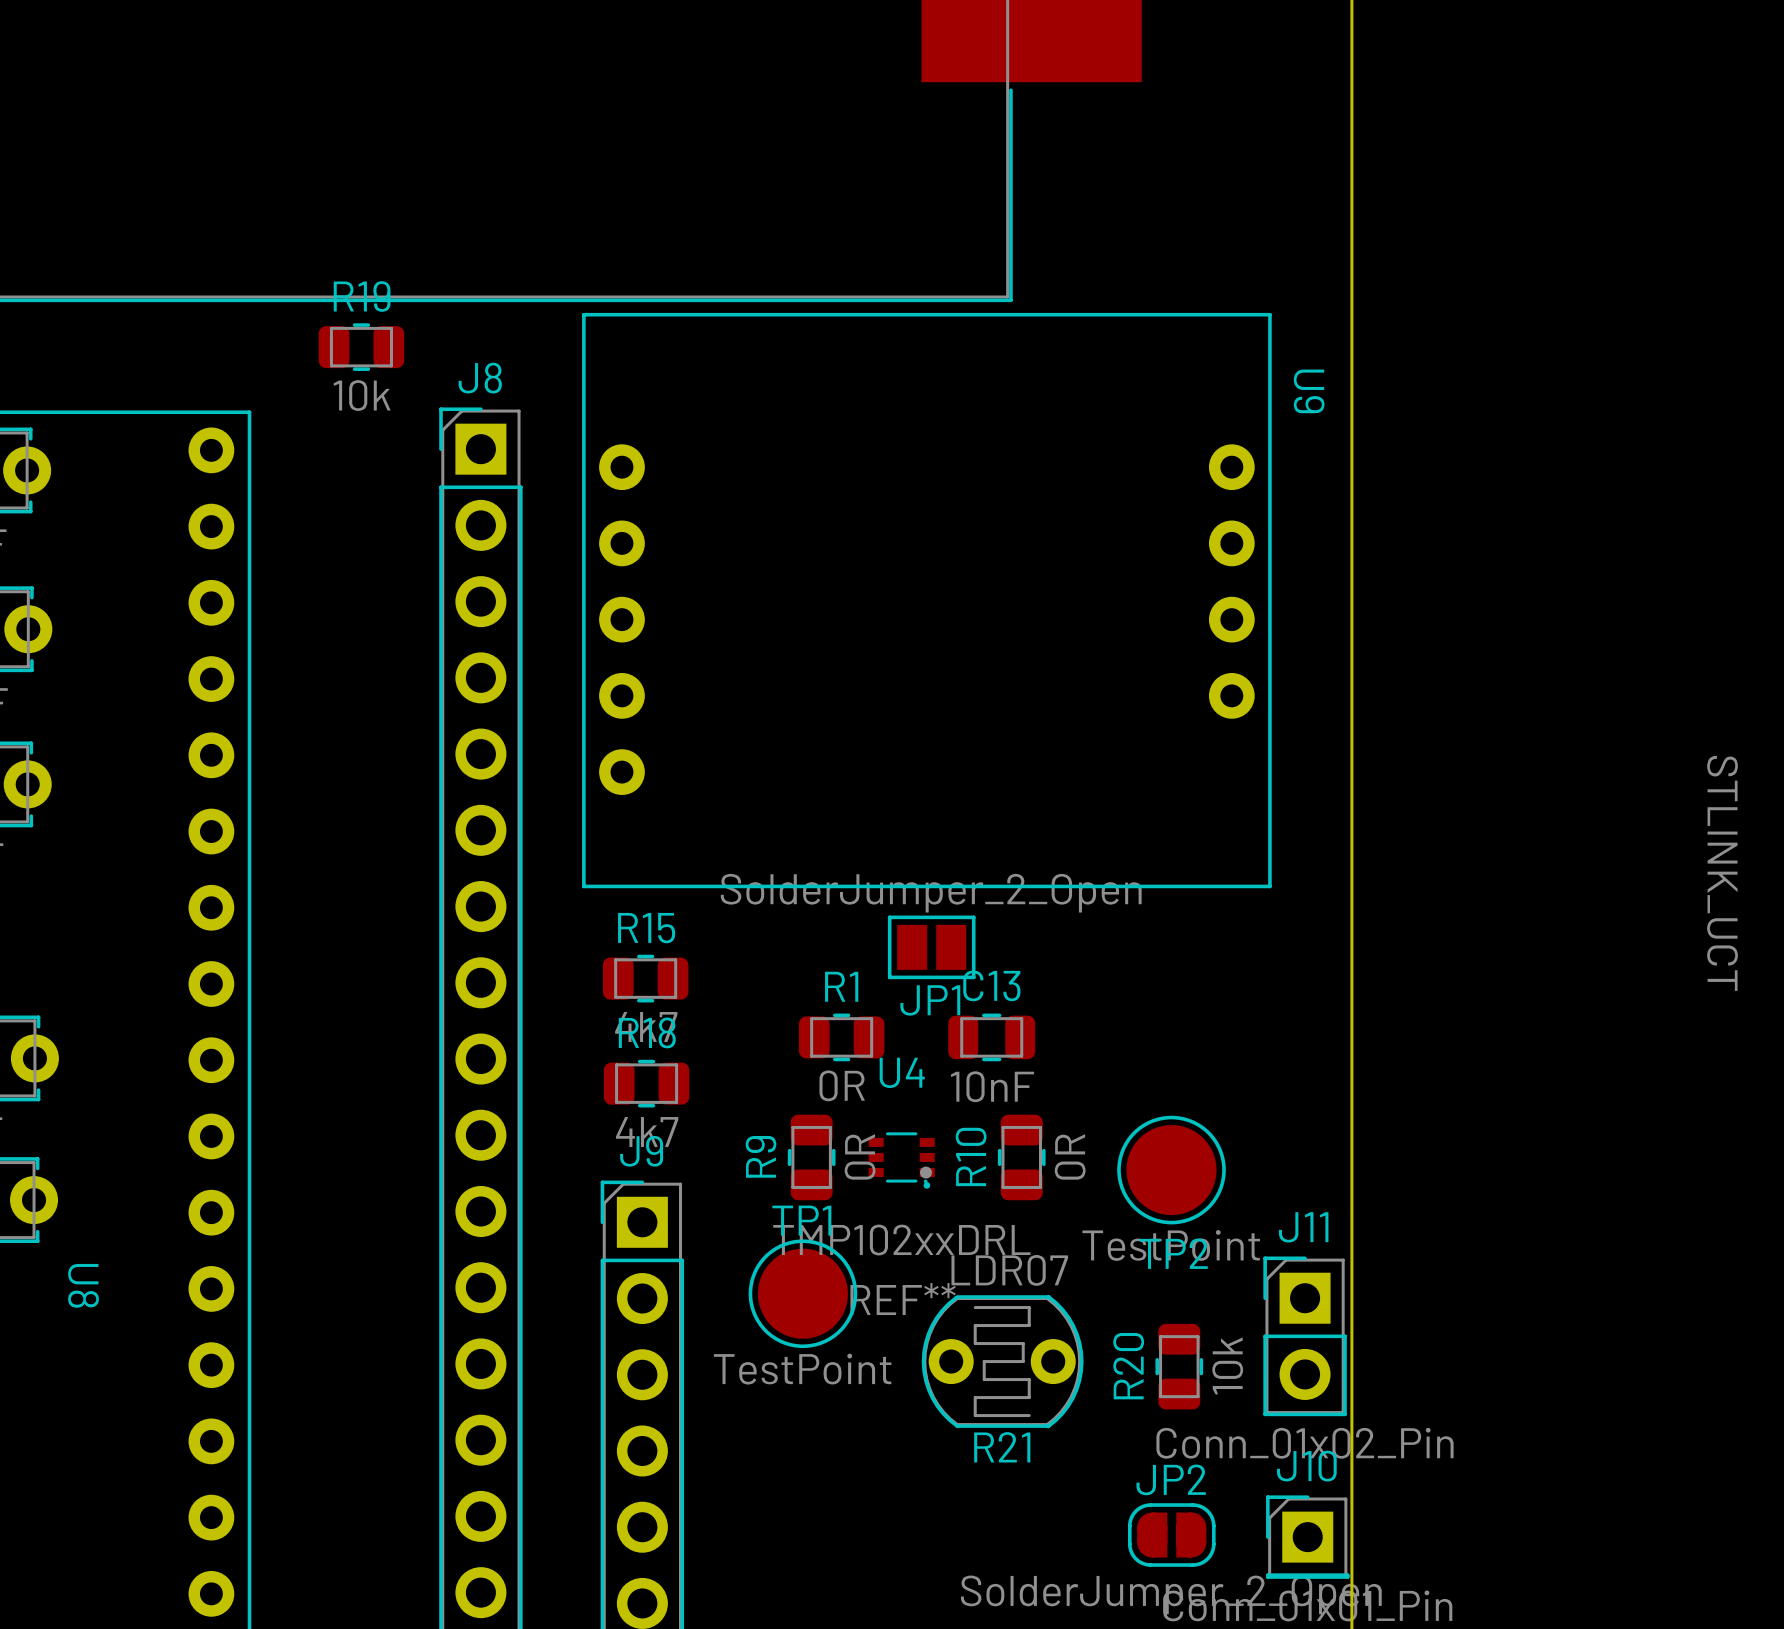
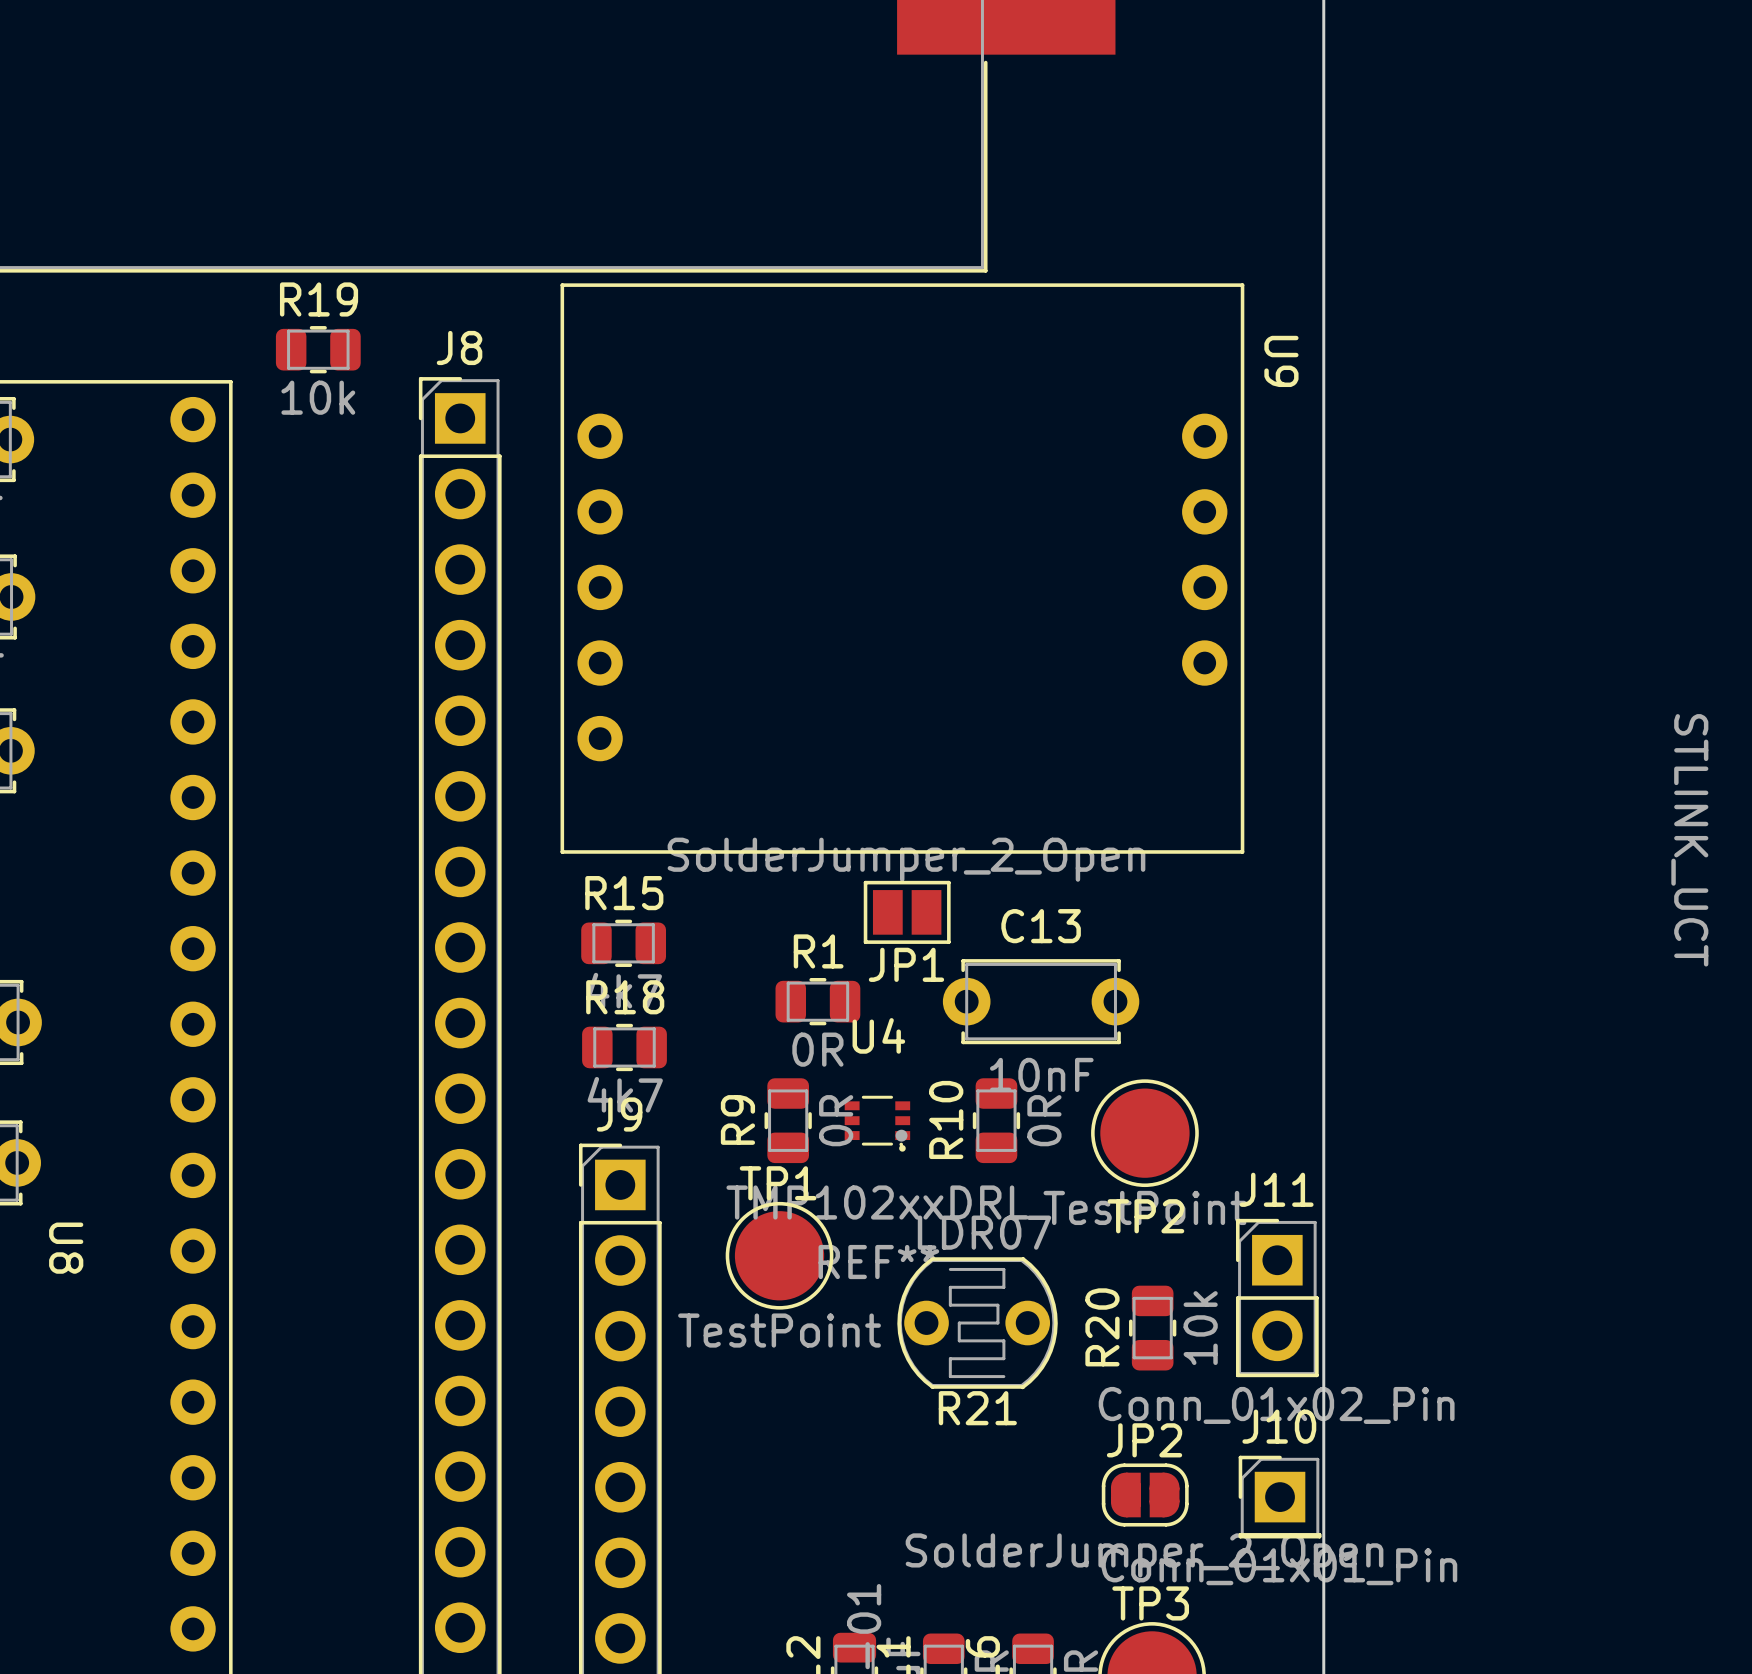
R19 position: (361, 347) -> (318, 349)
C13 footprint: [948, 1013, 1036, 1062] -> [942, 959, 1140, 1045]

